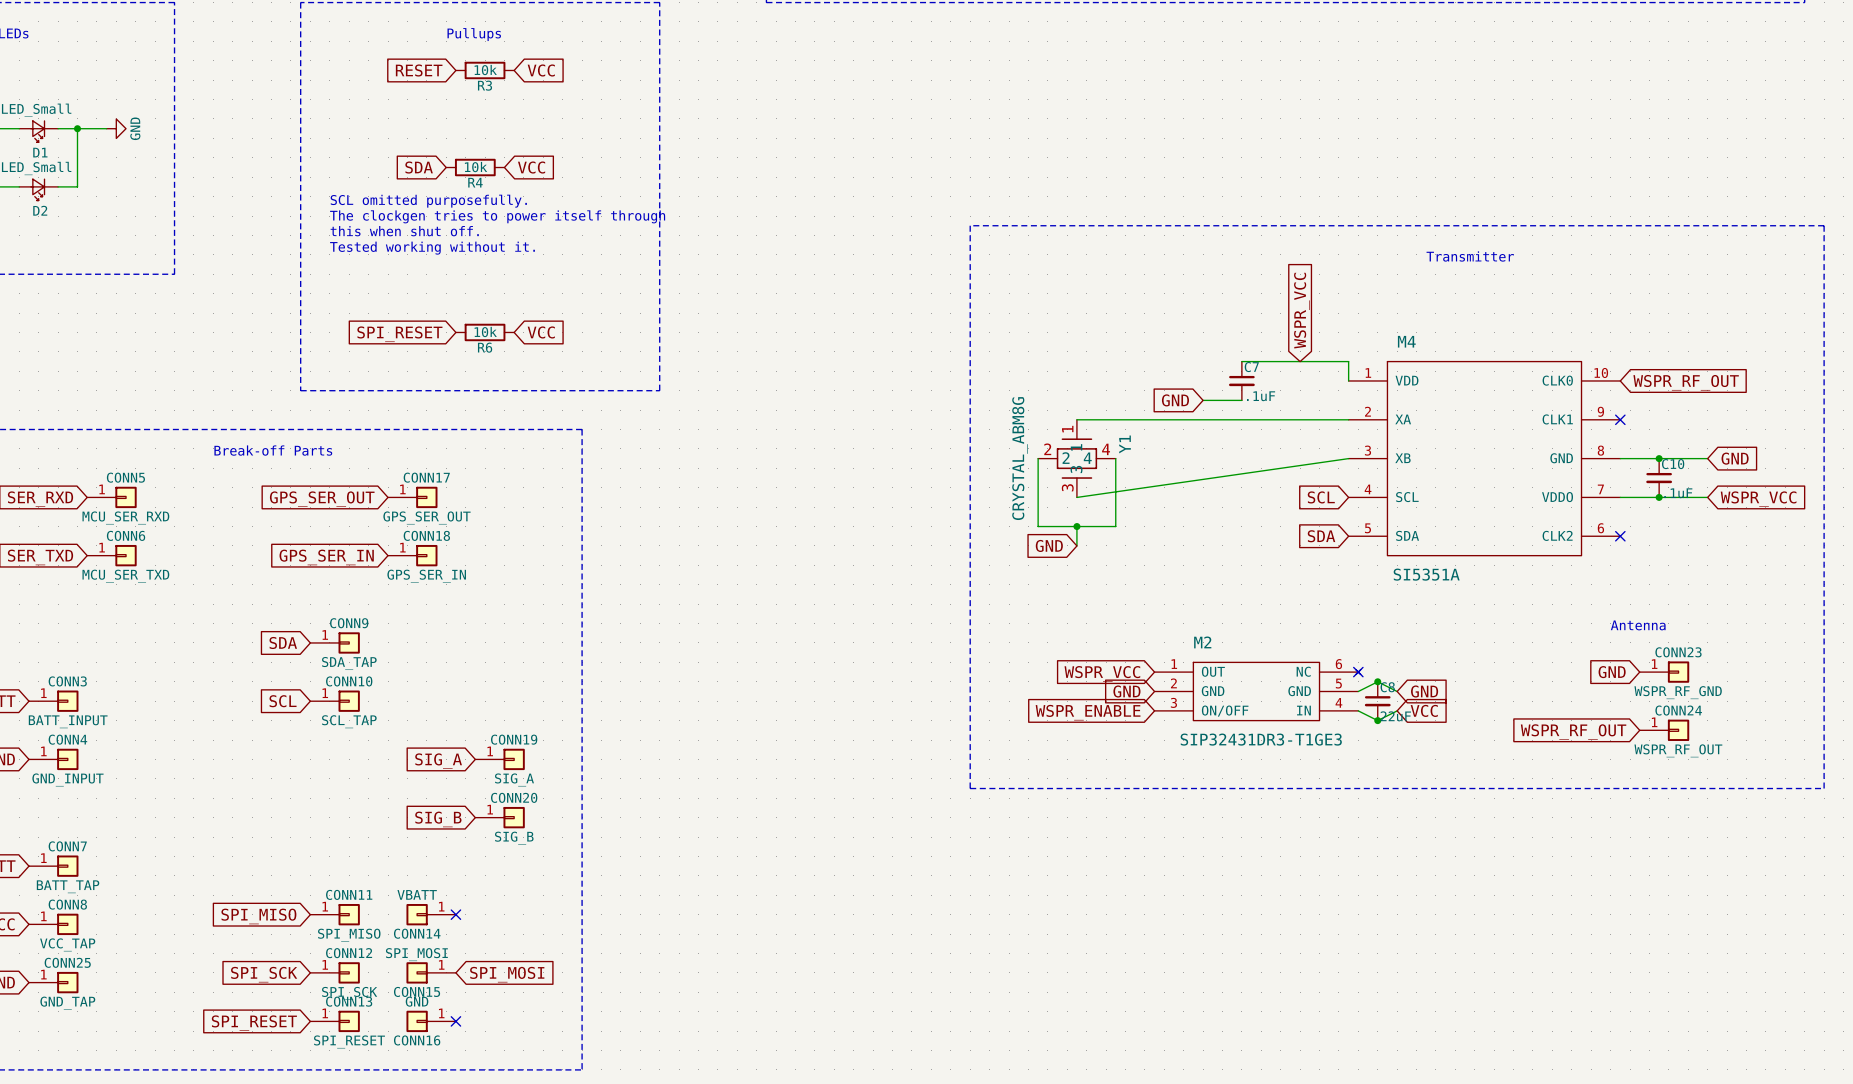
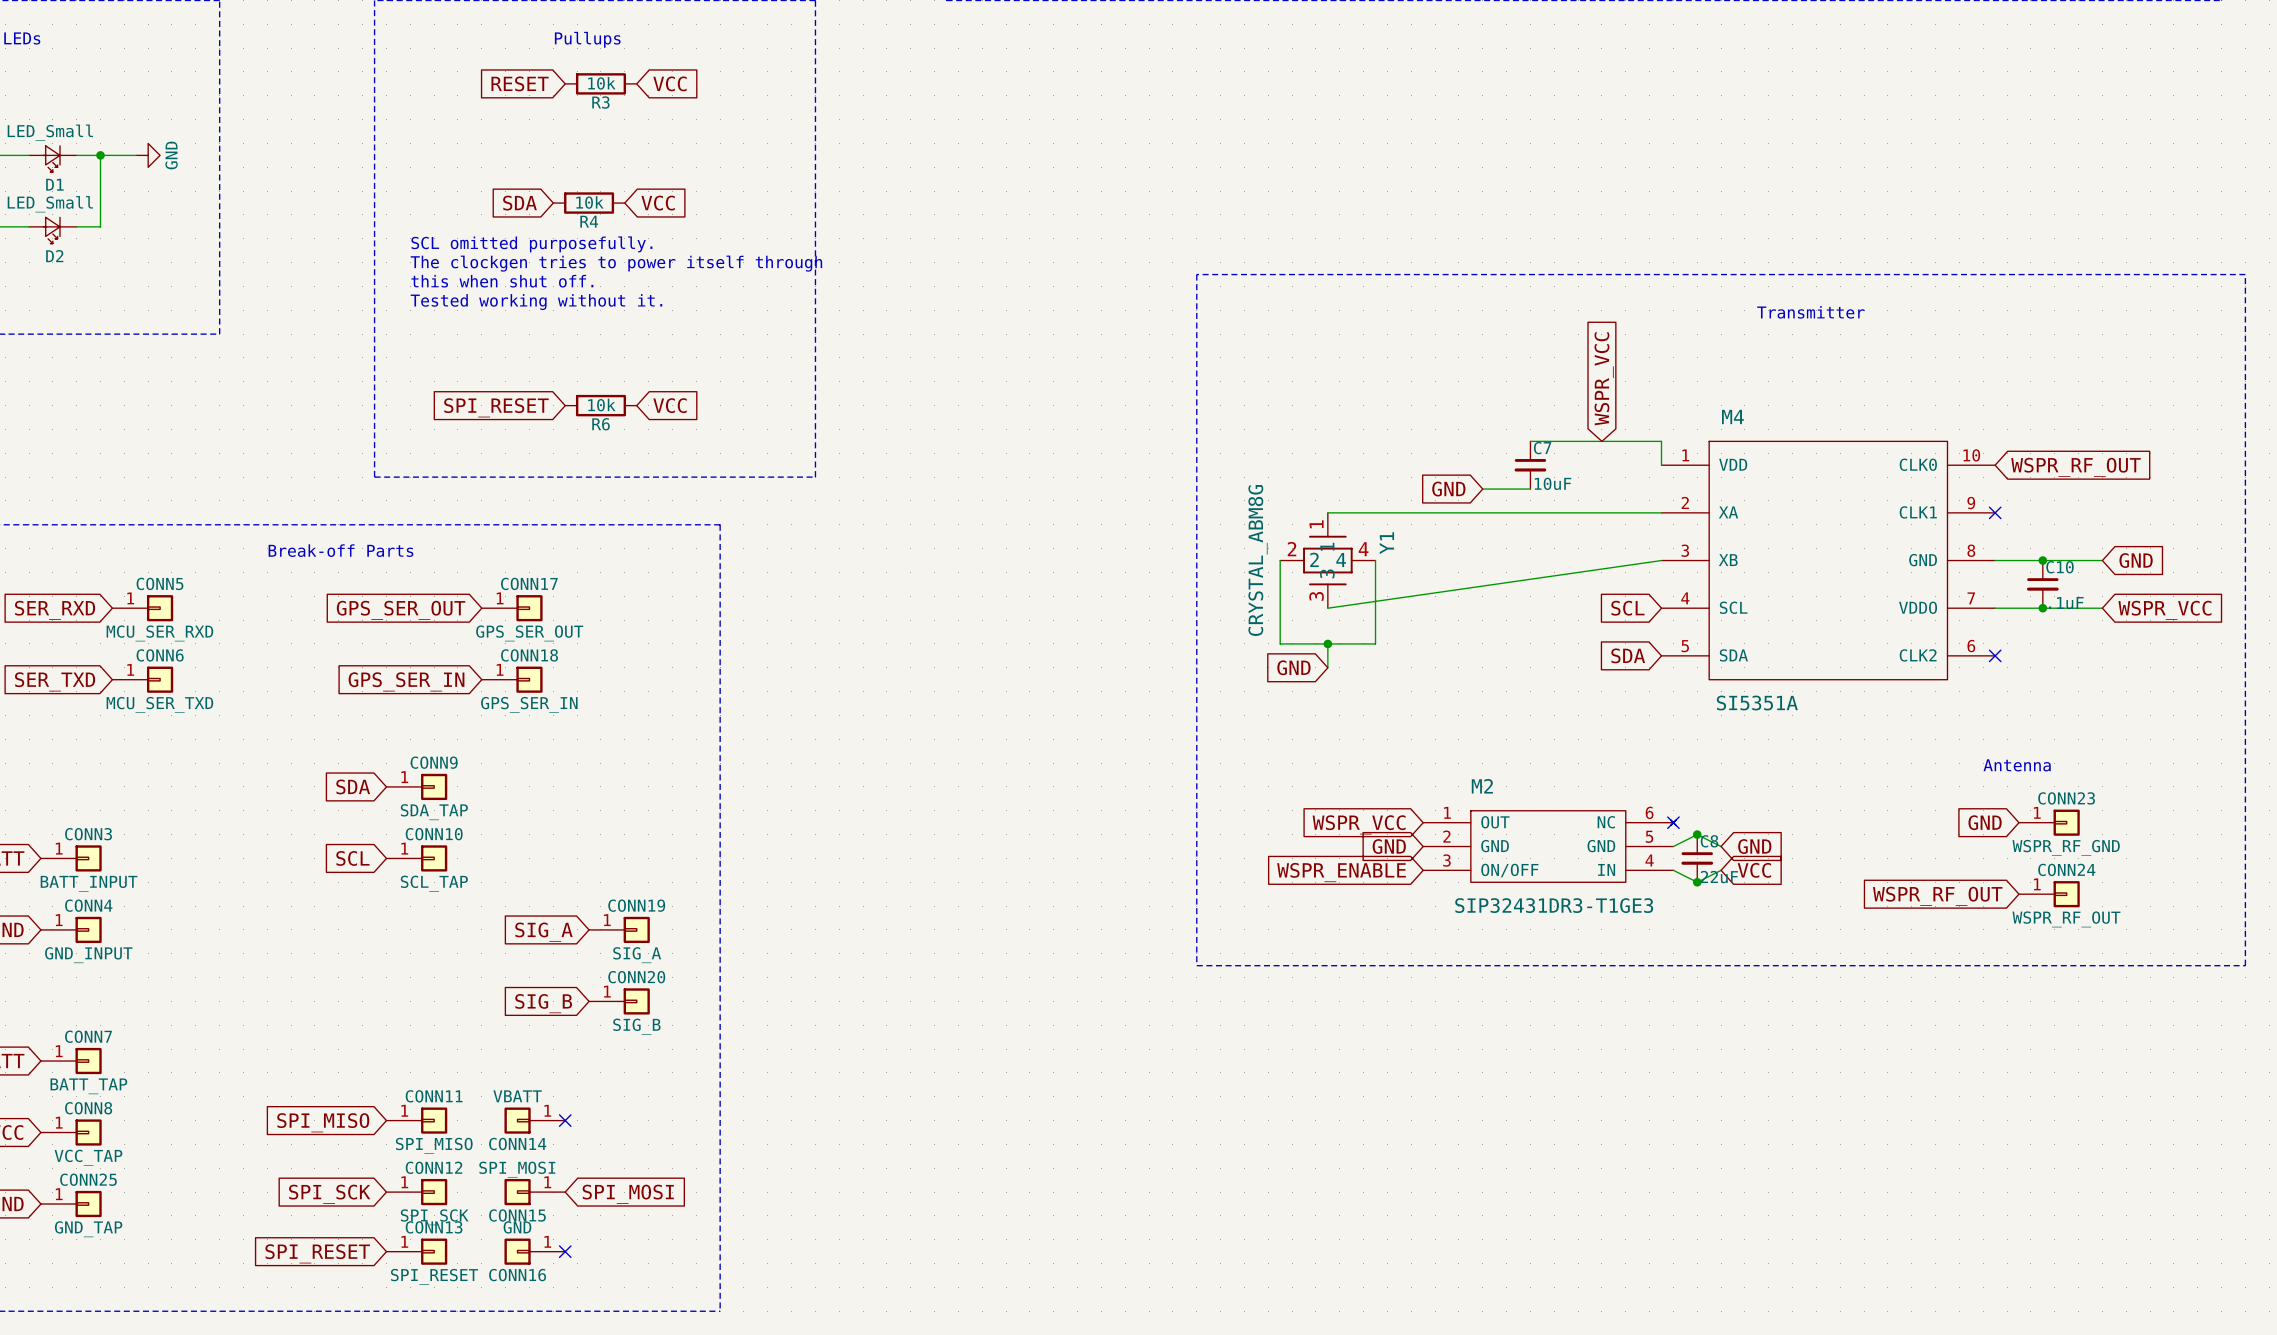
C7 value: .1uF (1261, 396) -> 10uF (1552, 483)

